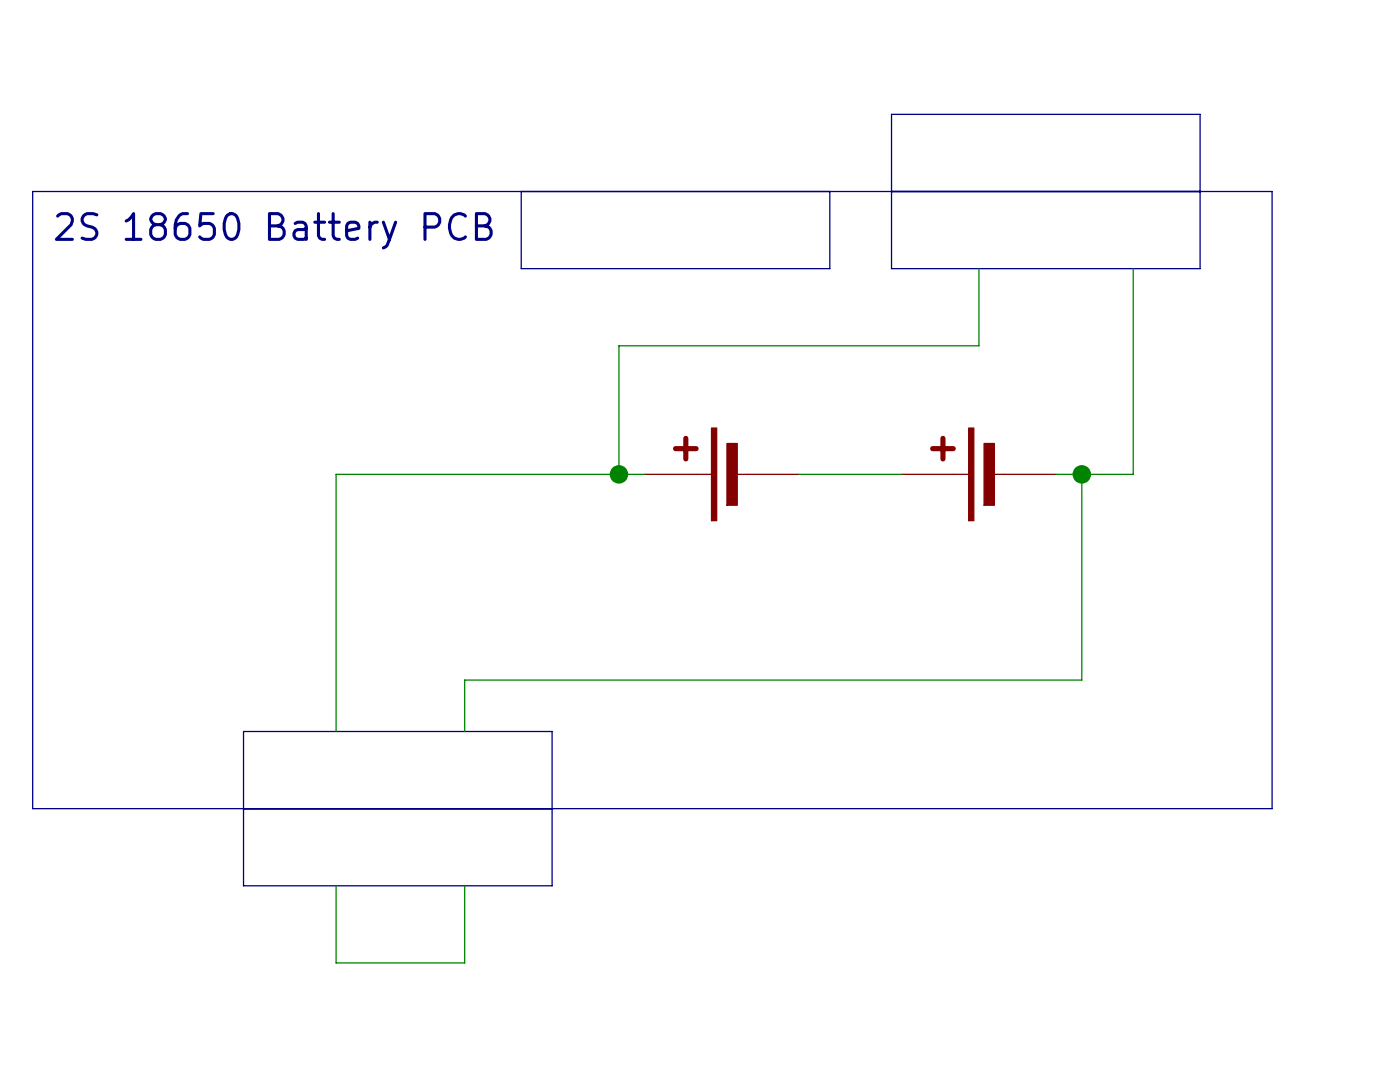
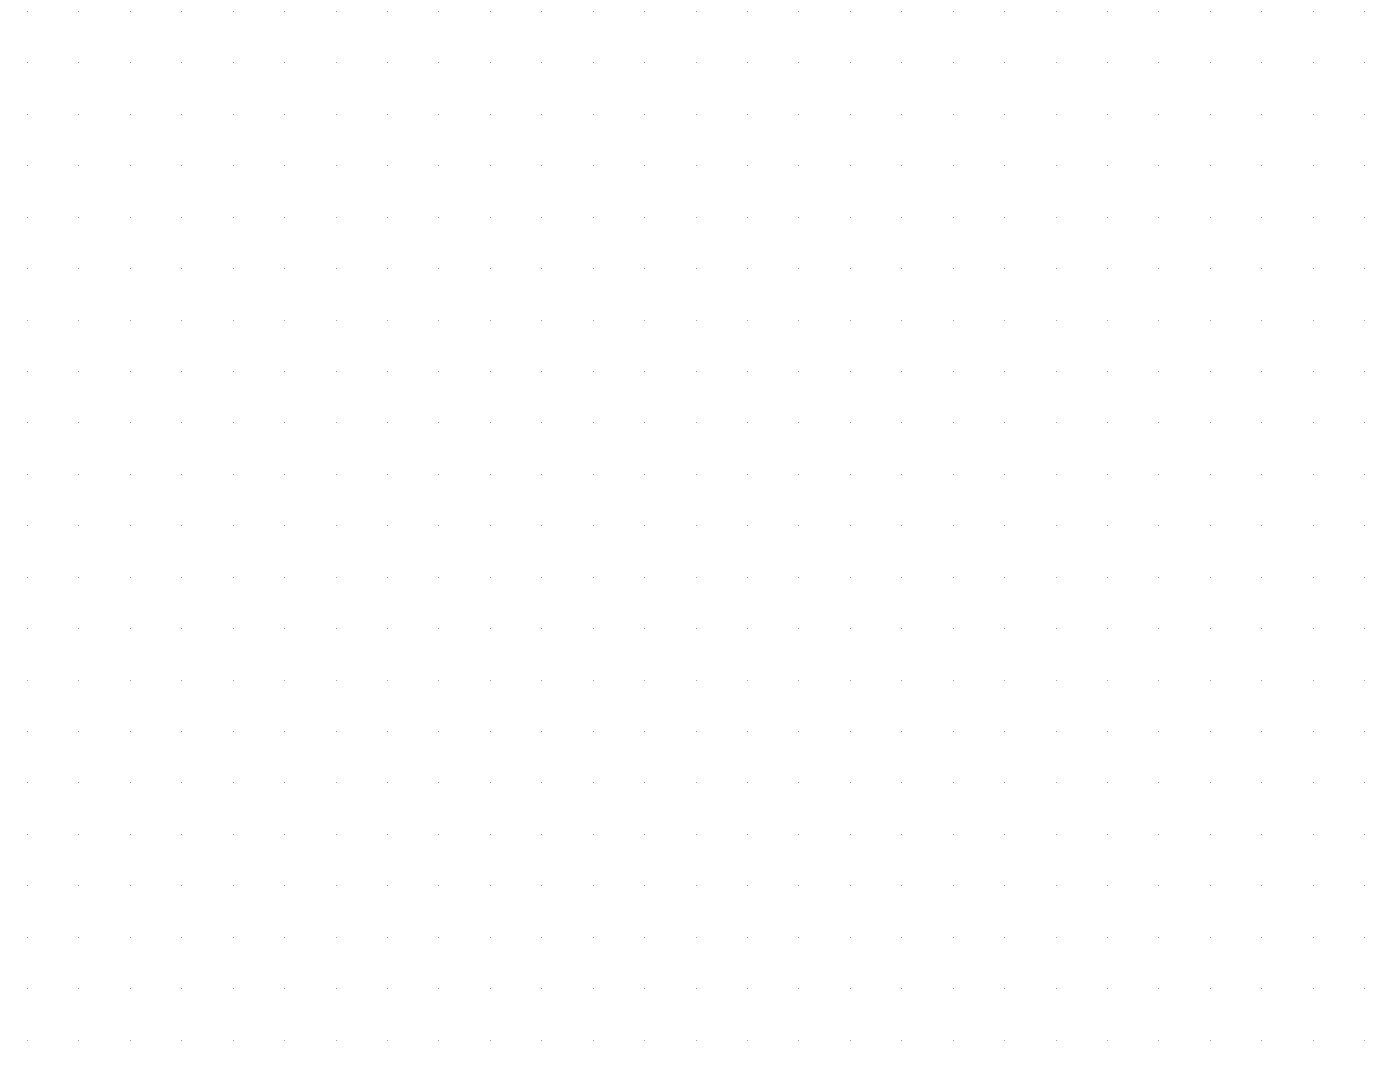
line: (891, 114) (891, 268) (1200, 268) (1200, 114) (891, 114) -> none
line: (32, 191) (1272, 191) (1272, 808) (32, 808) (32, 191) -> none
line: (521, 191) (521, 268) (829, 268) (829, 191) -> none
text: 2S 18650 Battery PCB (273, 230) -> none
wire: (978, 268) (978, 345) (618, 345) (618, 474) -> none
wire: (1133, 268) (1133, 474) (1056, 474) -> none
junction: (618, 474) -> none
wire: (644, 474) (336, 474) (336, 731) -> none
part: (721, 474) -> none
wire: (798, 474) (901, 474) -> none
part: (978, 474) -> none
wire: (1081, 474) (1081, 680) (464, 680) (464, 731) -> none
junction: (1081, 474) -> none
line: (243, 731) (552, 731) (552, 885) (243, 885) (243, 731) -> none
wire: (336, 885) (336, 962) (464, 962) (464, 885) -> none

